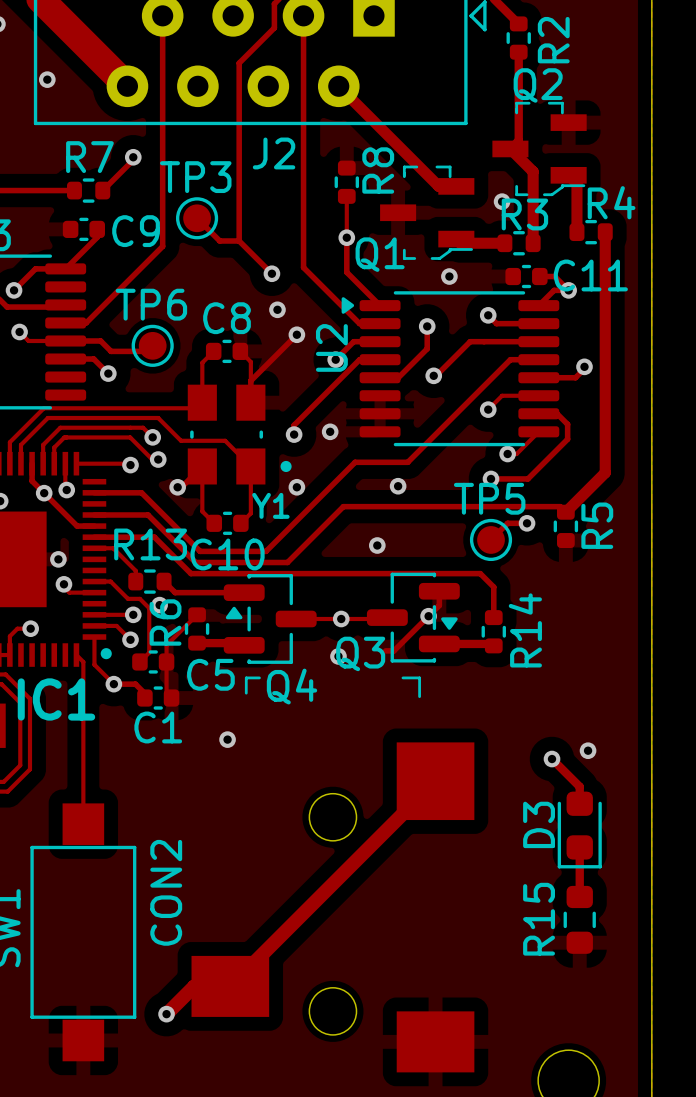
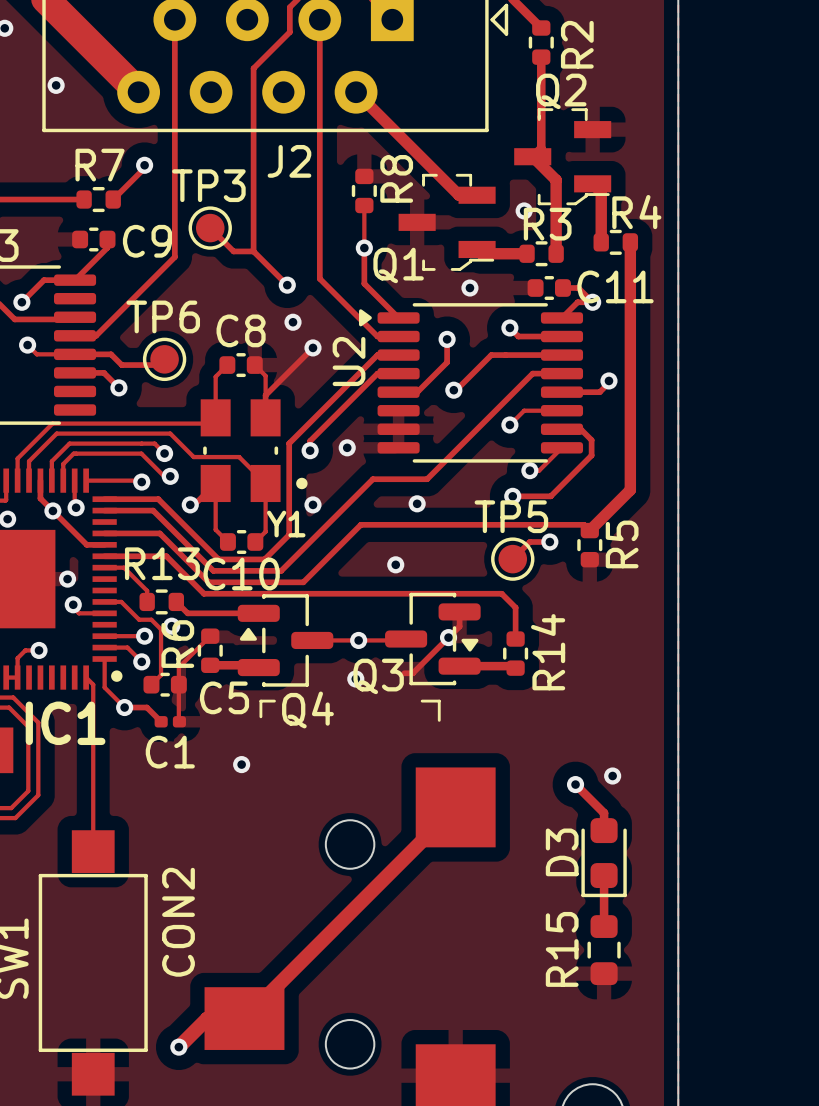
track: (359, 341) (353, 341) (335, 359) -> (377, 355) (289, 443) (289, 534) (264, 559) (218, 559) (158, 499) (104, 499)
via: (335, 359) -> none
C1 footprint: [137, 686, 180, 710] -> [154, 716, 186, 728]

